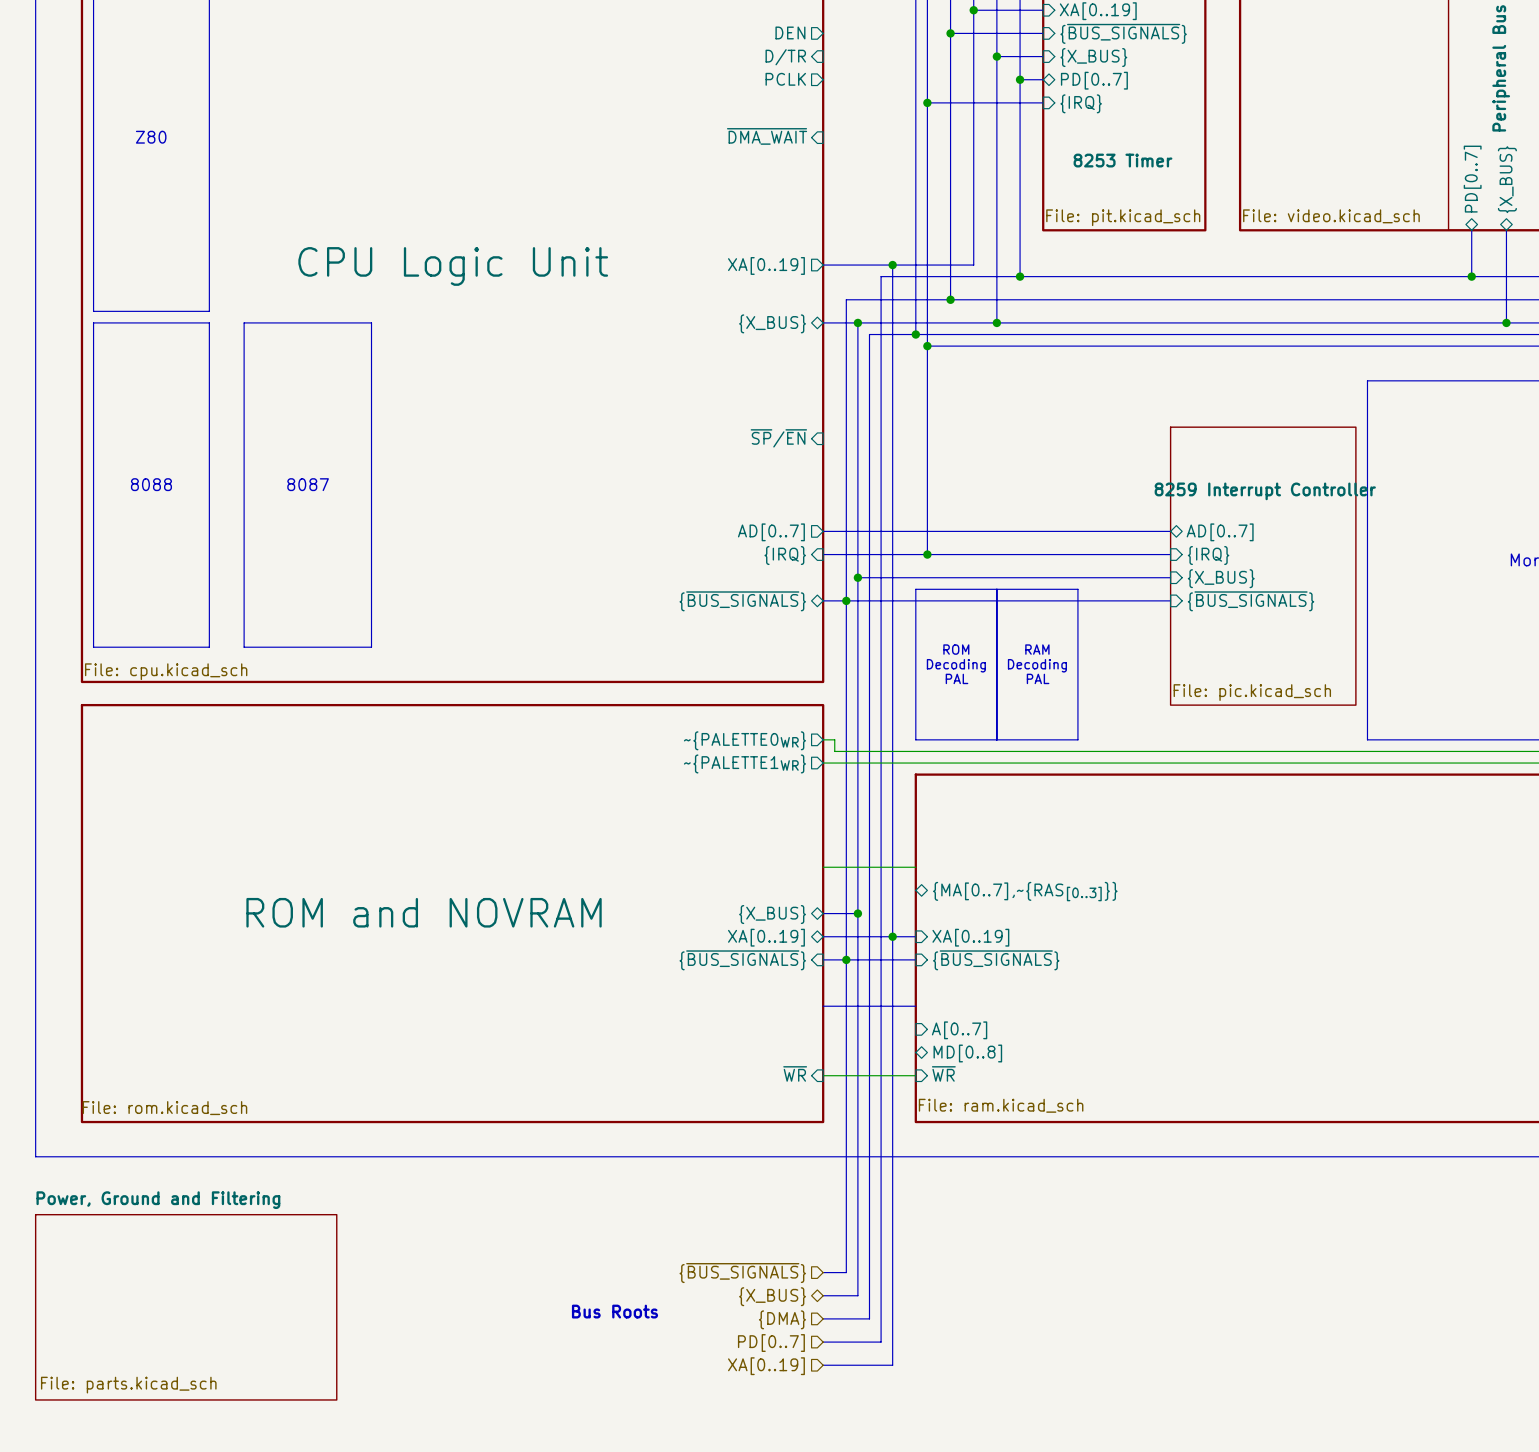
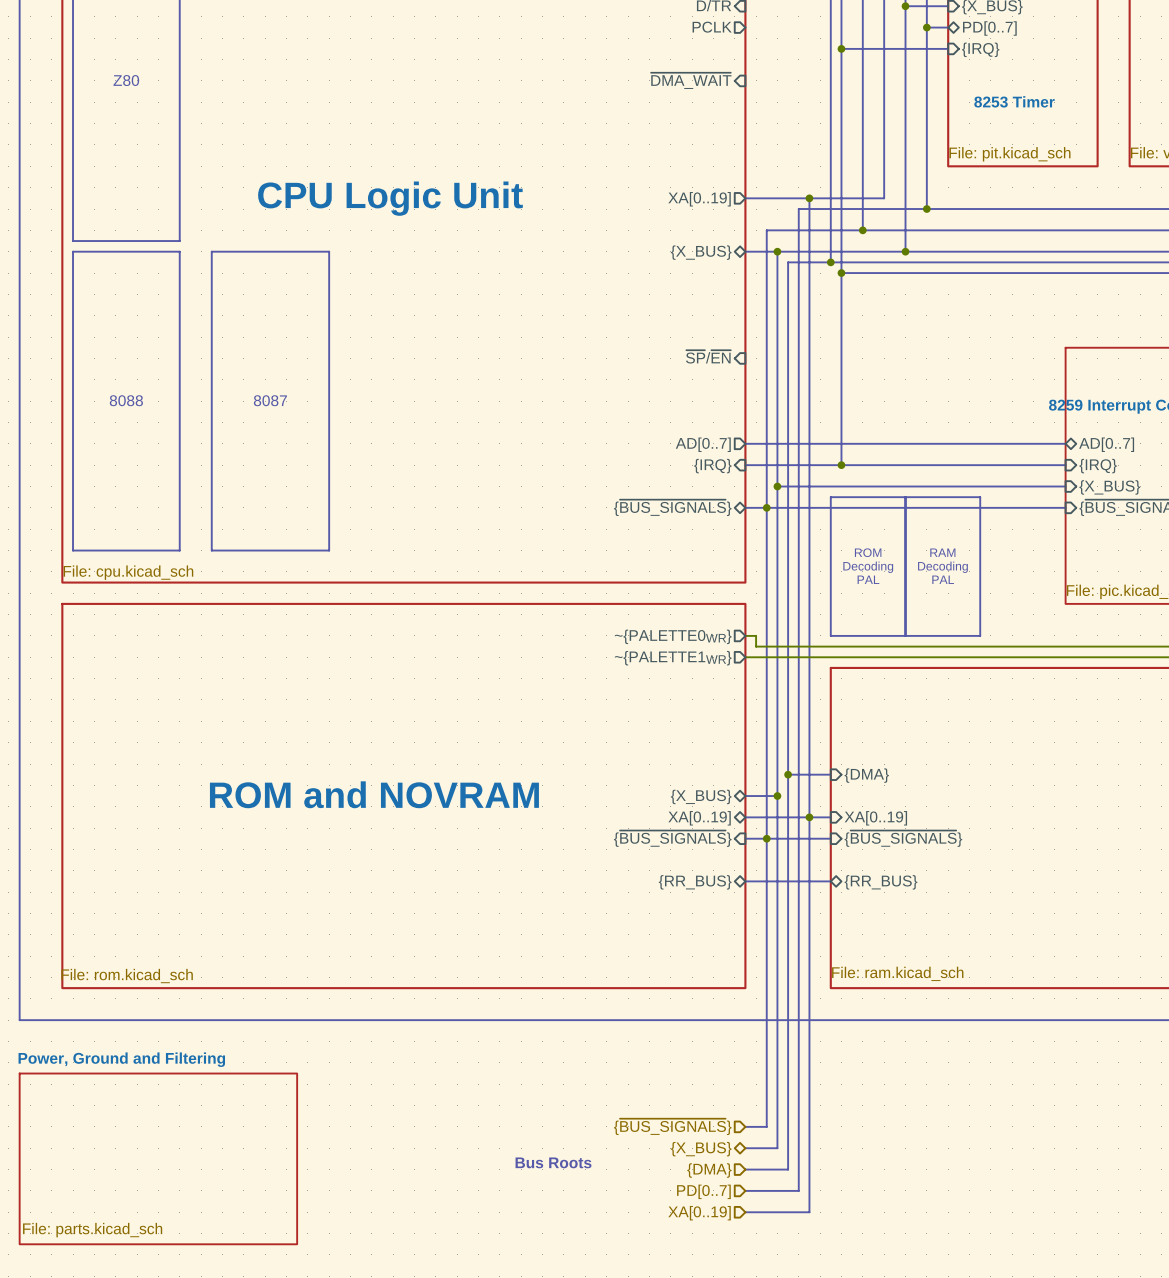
wire: (823, 867) (915, 867) -> none
bus: none -> (788, 774) (830, 774)
junction: none -> (788, 774)
sheet pin shape: bidirectional (1025, 891) -> input (866, 775)
sheet pin: {MA[0..7],~{RAS[0..3]}} (1025, 891) -> {DMA} (866, 775)
sheet pin: none -> {RR_BUS} (695, 882)
sheet pin: none -> {RR_BUS} (880, 882)
sheet pin: A[0..7] (959, 1030) -> none
sheet pin: MD[0..8] (967, 1053) -> none
sheet pin: ~{WR} (795, 1073) -> none
sheet pin: ~{WR} (943, 1073) -> none
wire: (823, 1075) (915, 1075) -> none

